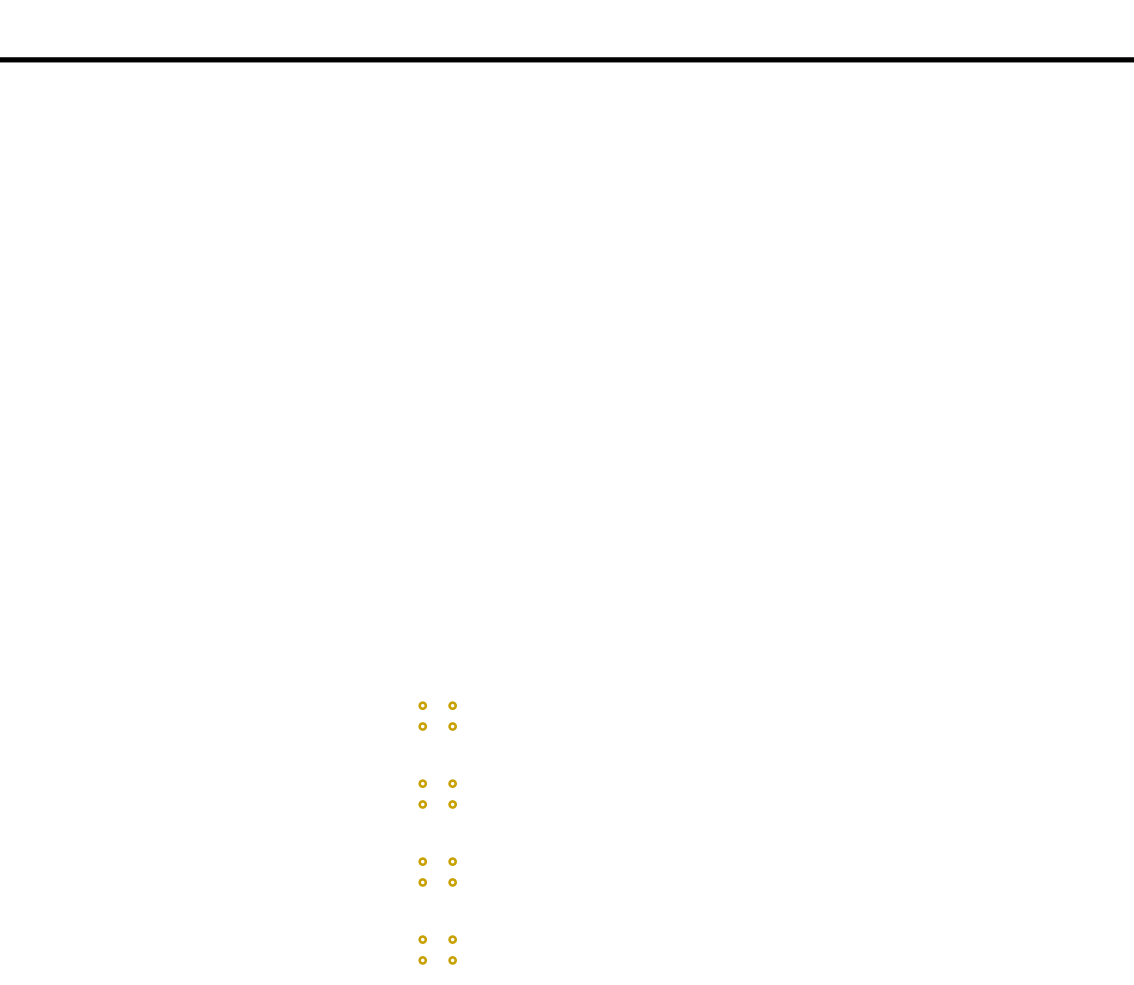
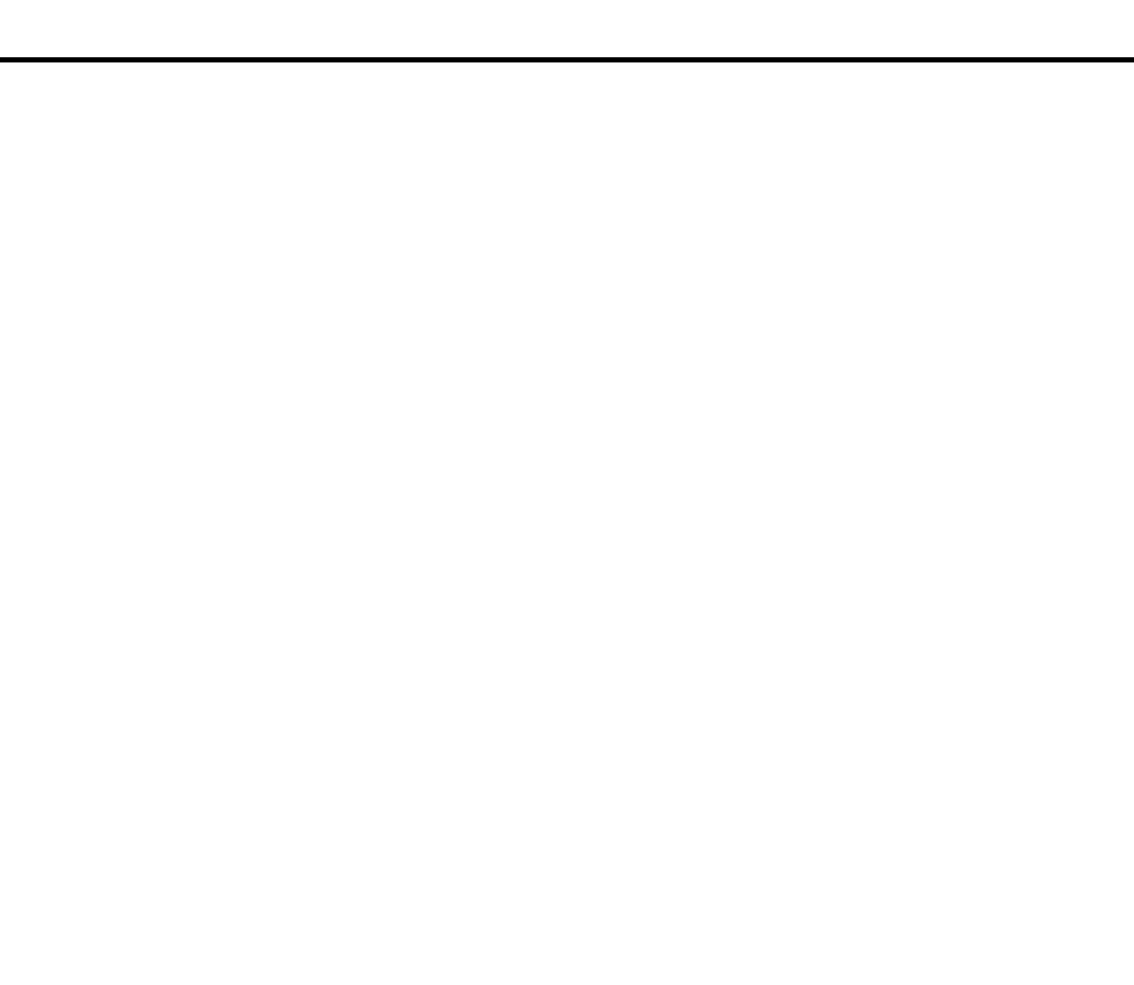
part: (437, 716) -> none
part: (437, 794) -> none
part: (437, 872) -> none
part: (437, 950) -> none

